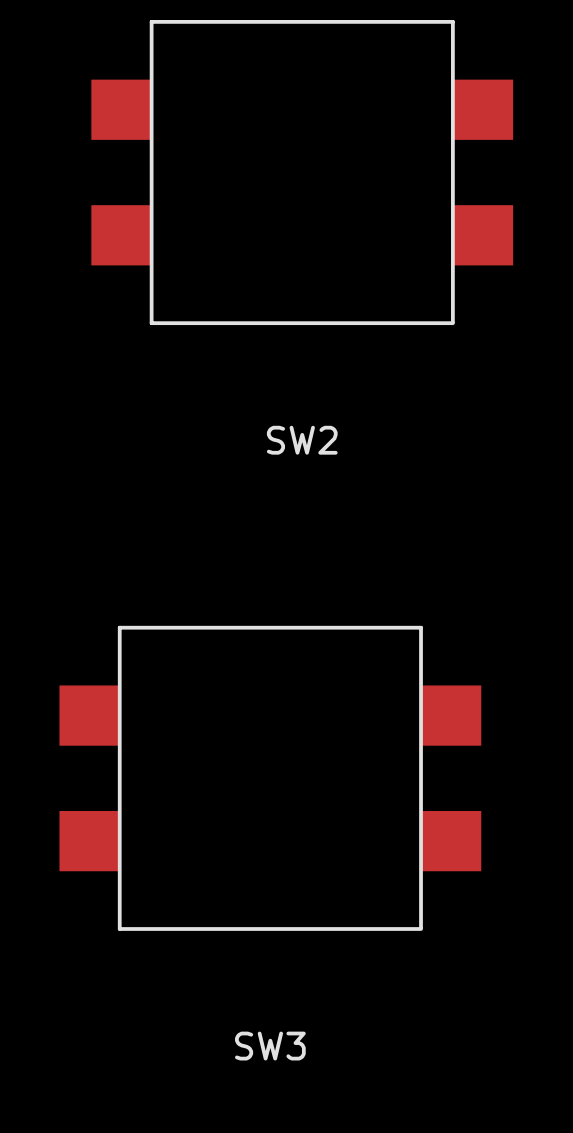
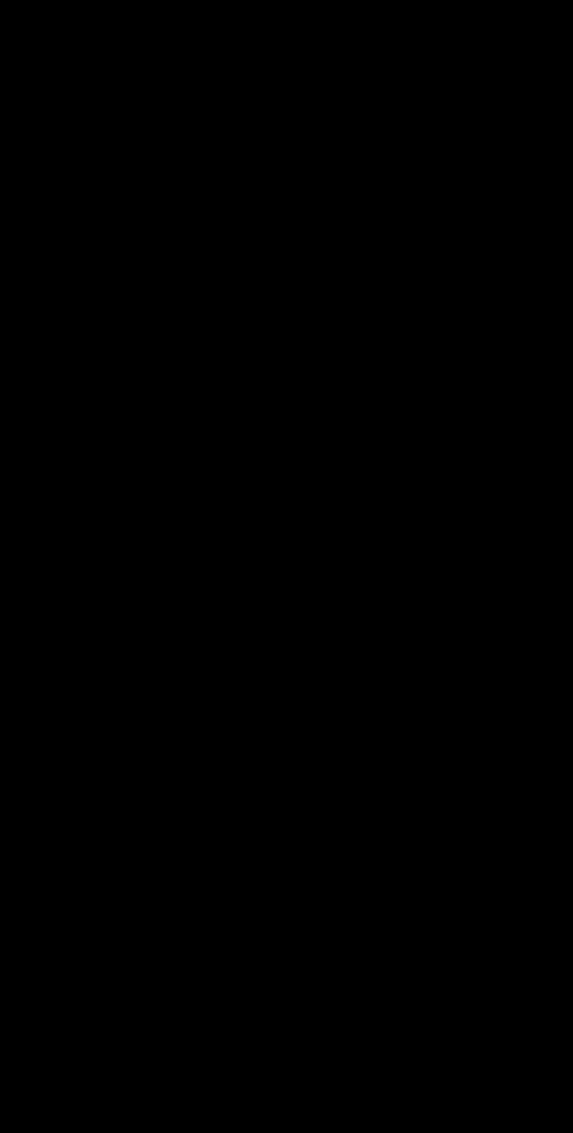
SW2: (302, 172) -> none
SW3: (270, 778) -> none

